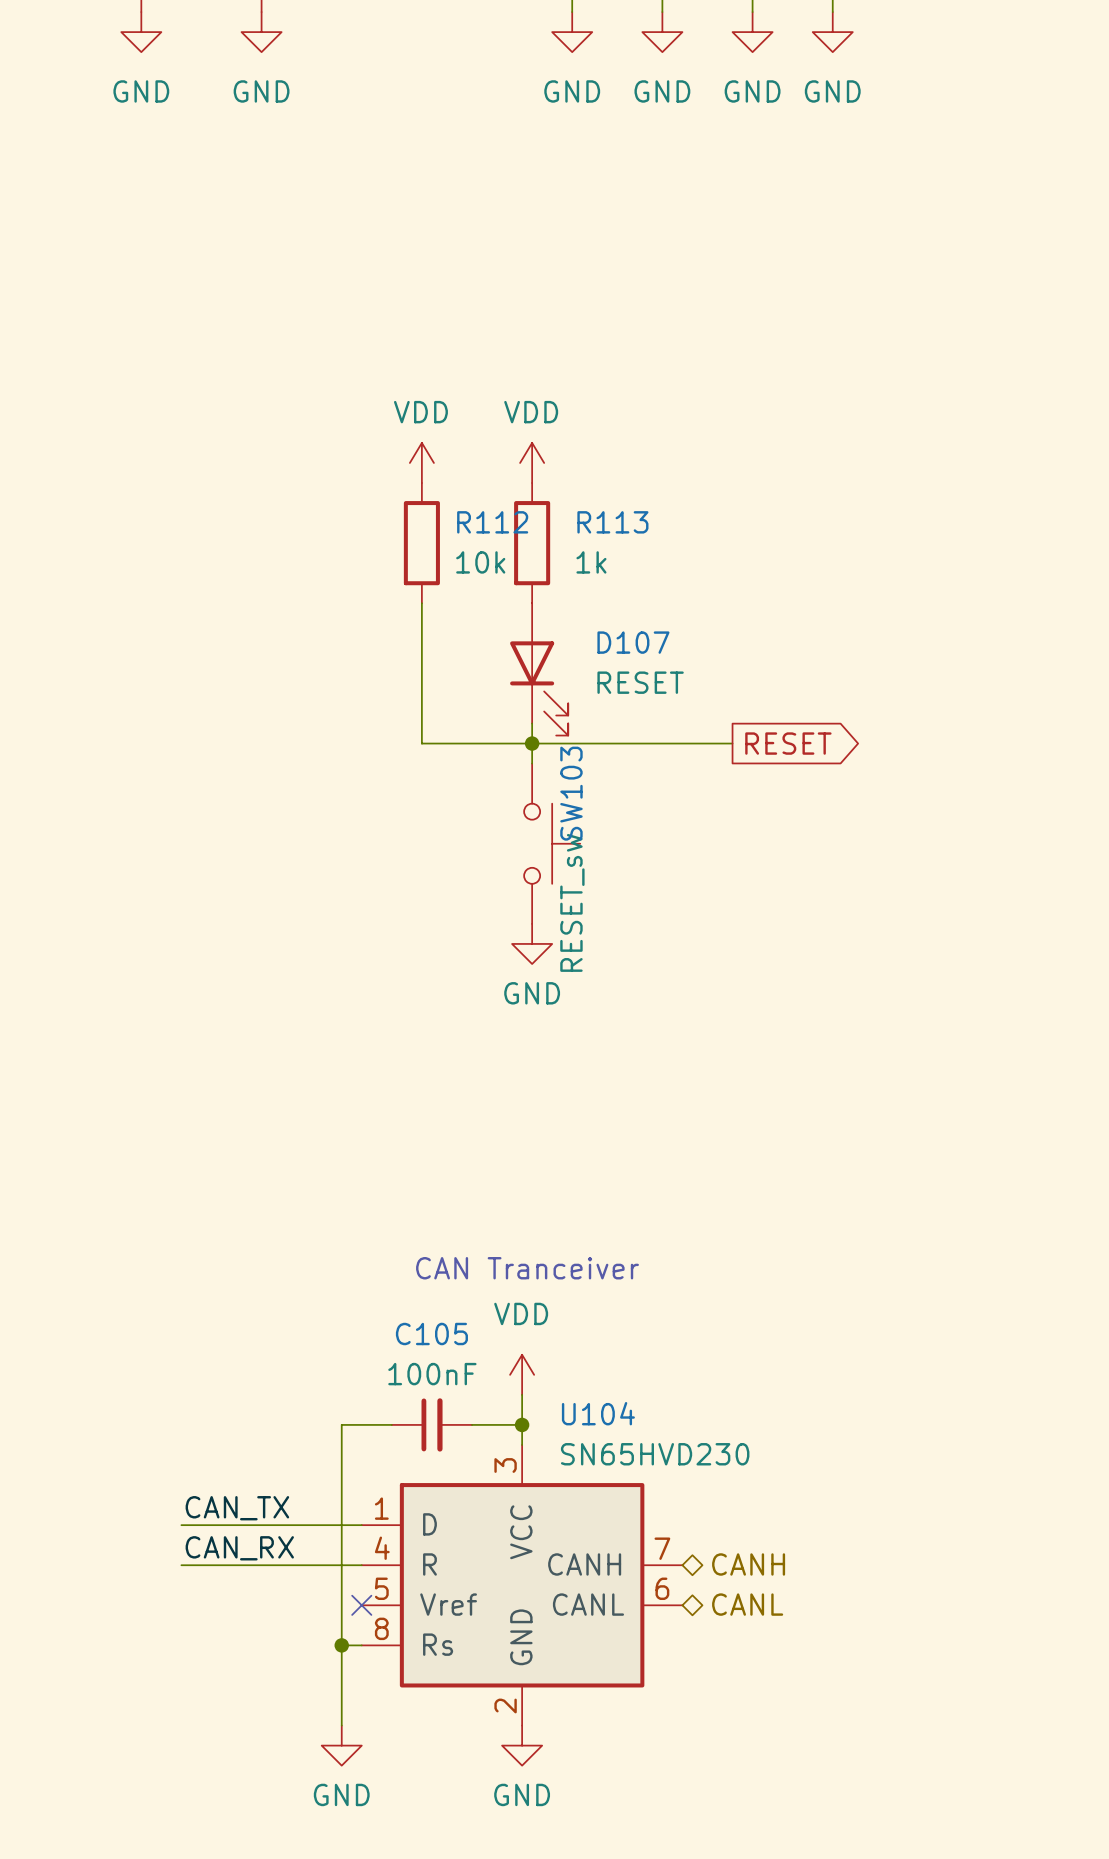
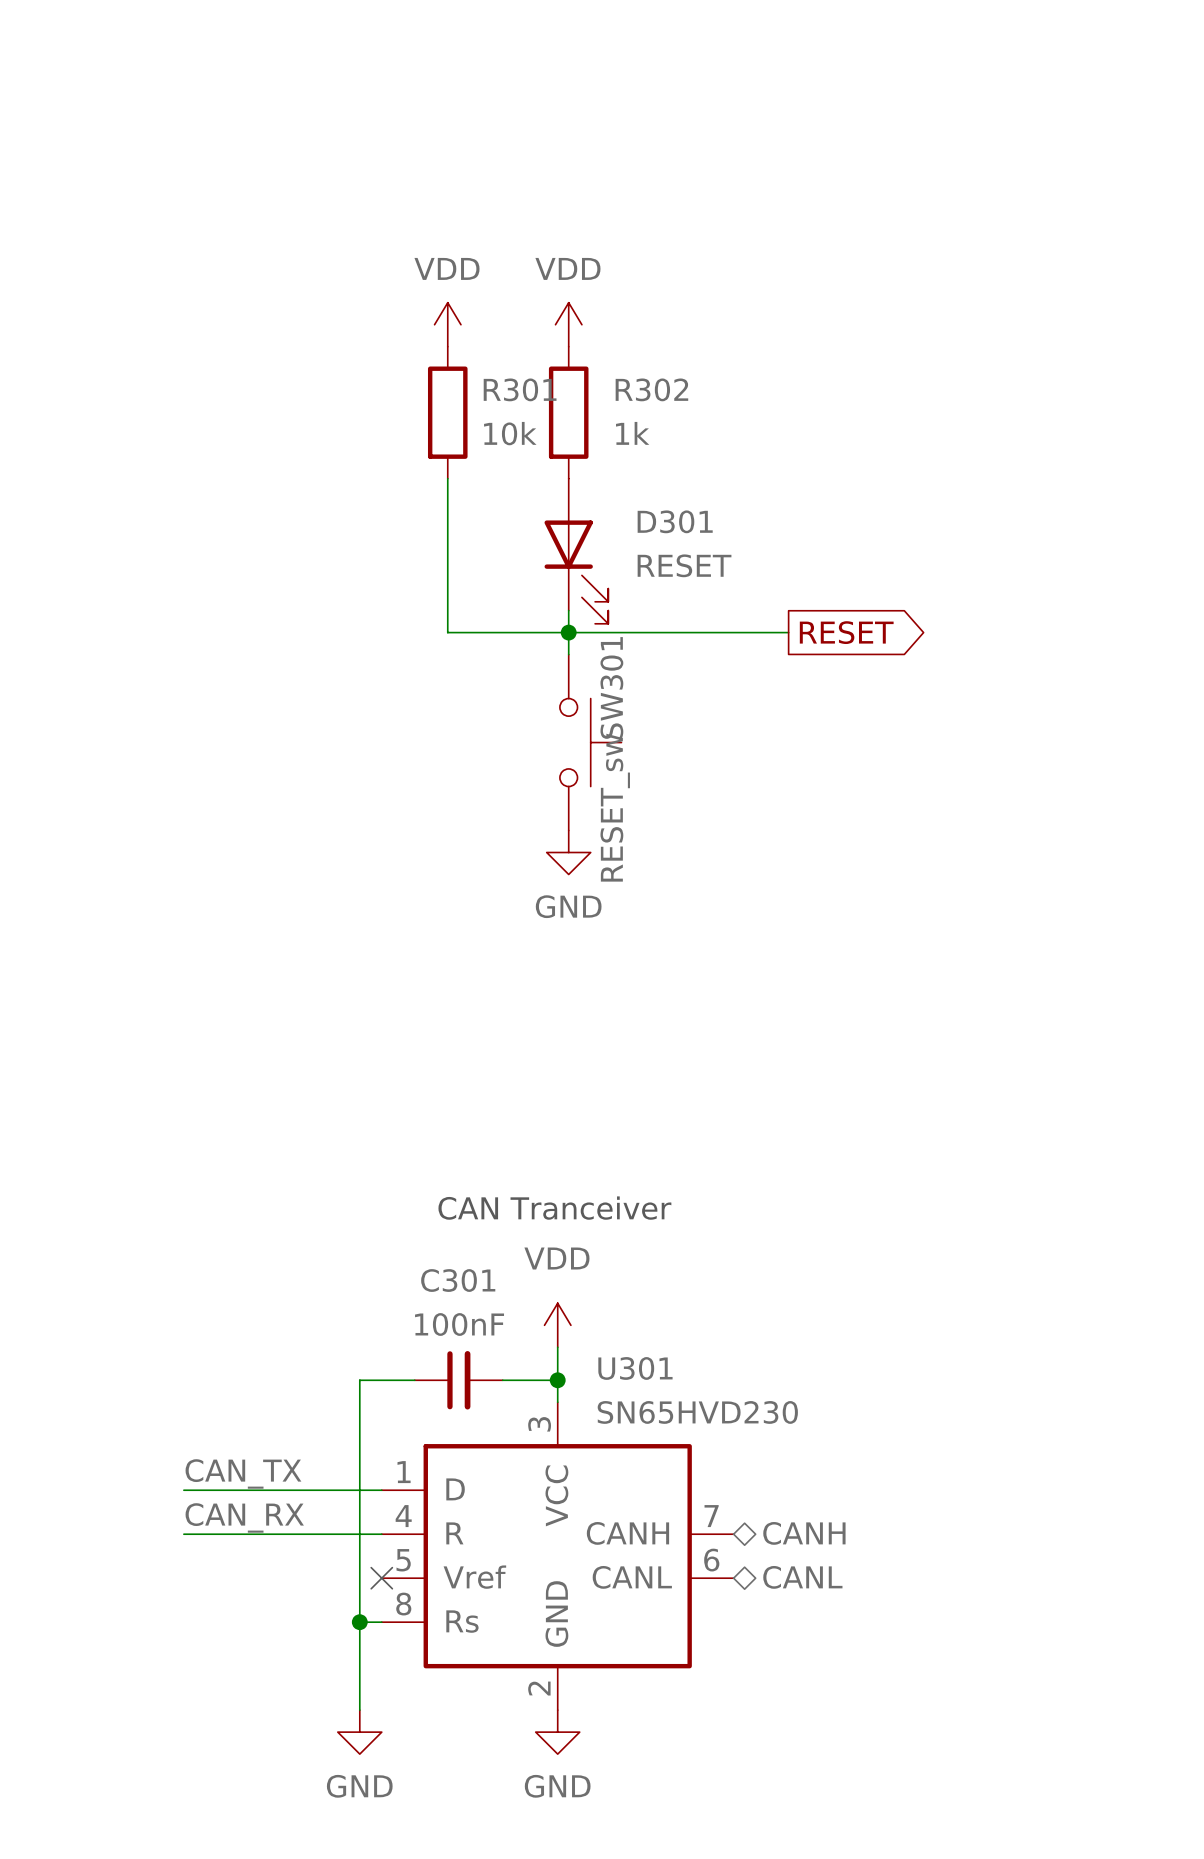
R112 name: R112 (492, 522) -> R301 (520, 389)
R113 name: R113 (612, 522) -> R302 (651, 389)
D107 name: D107 (633, 642) -> D301 (675, 521)
SW103 name: SW103 (571, 793) -> SW301 (611, 687)
C105 name: C105 (431, 1334) -> C301 (458, 1280)
U104 name: U104 (598, 1413) -> U301 (635, 1368)

